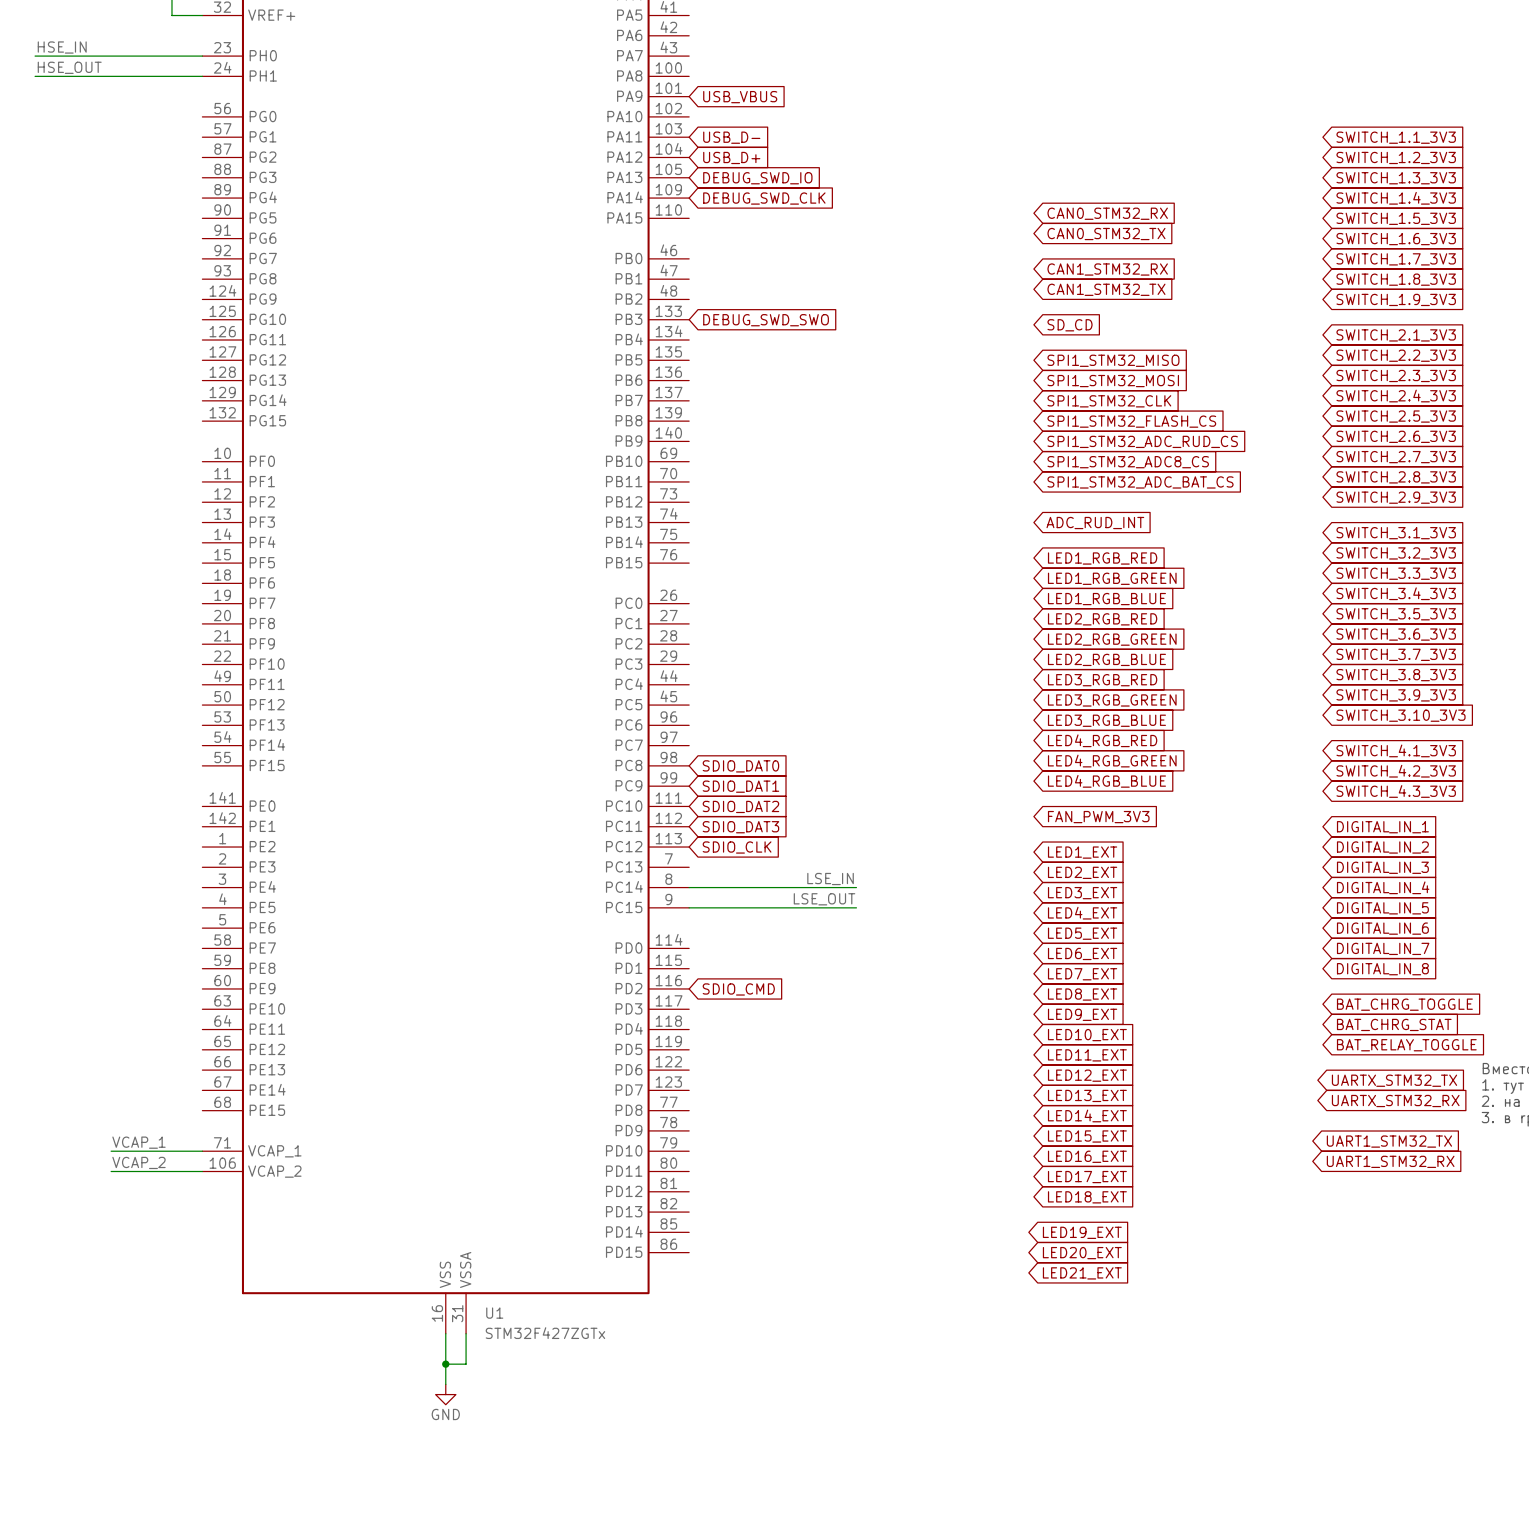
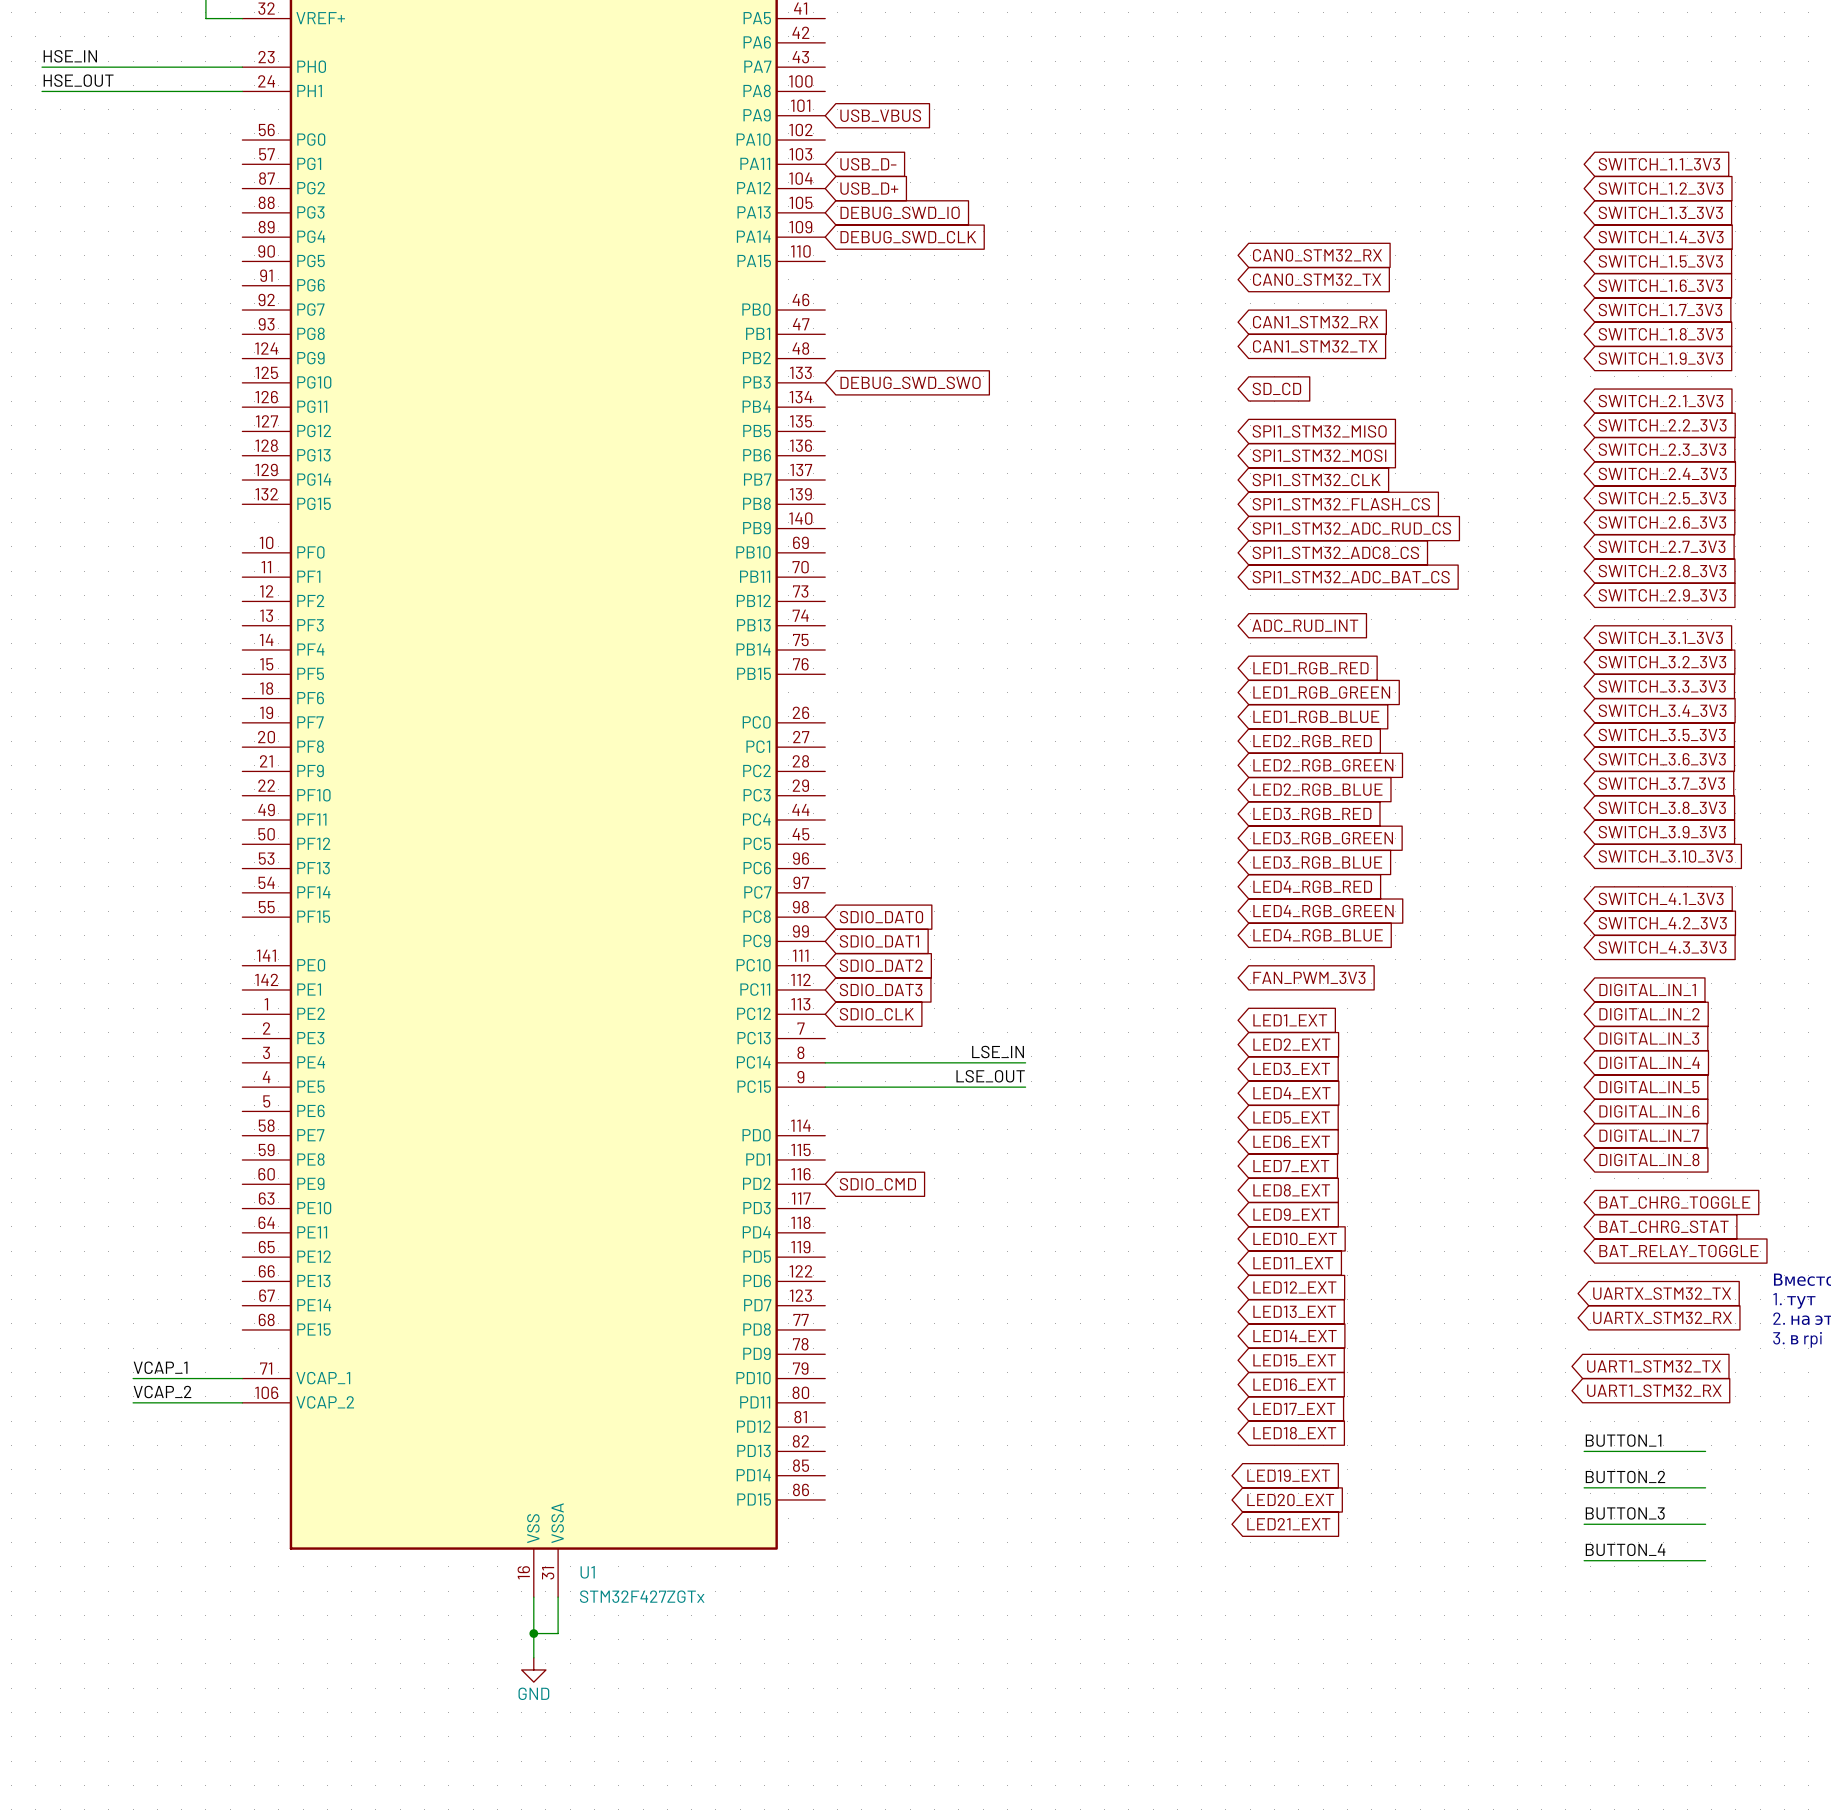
label: none -> BUTTON_1 (1623, 1440)
wire: none -> (1584, 1451) (1705, 1451)
label: none -> BUTTON_2 (1625, 1477)
wire: none -> (1584, 1487) (1705, 1487)
label: none -> BUTTON_3 (1625, 1513)
wire: none -> (1584, 1524) (1705, 1524)
label: none -> BUTTON_4 (1625, 1549)
wire: none -> (1584, 1560) (1705, 1560)

